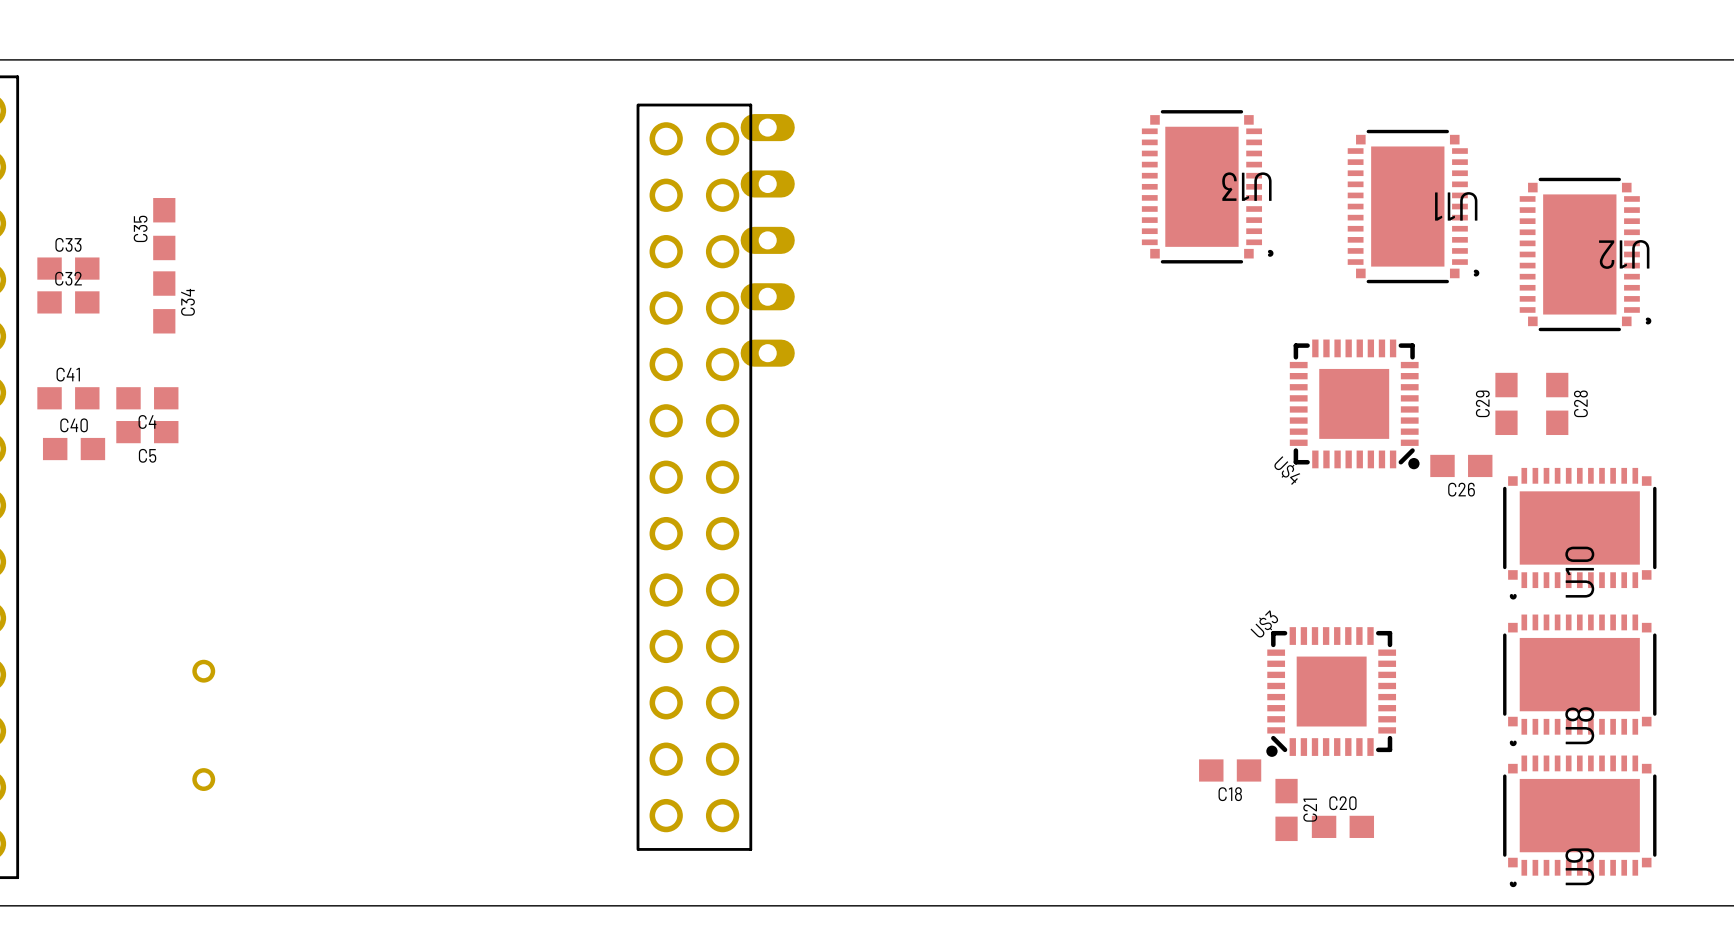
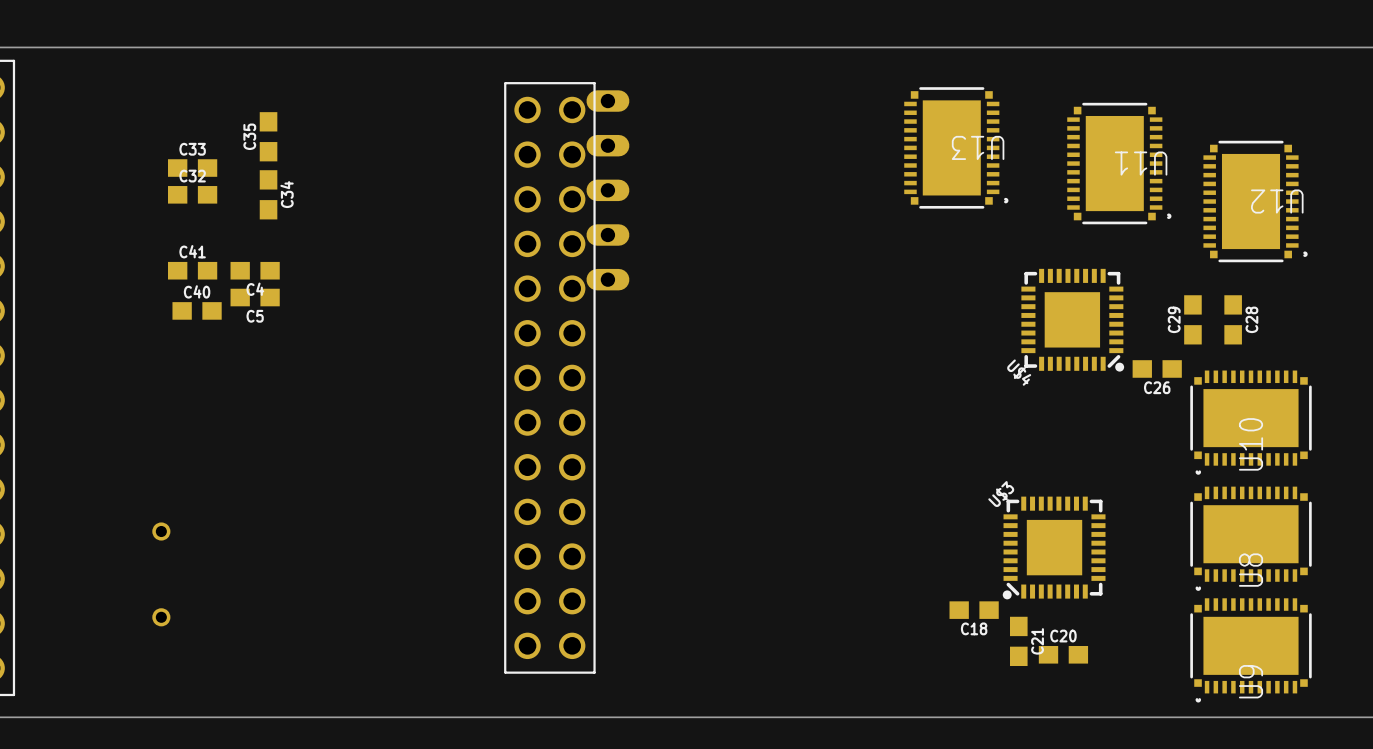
C35 position: (164, 229) -> (268, 136)
C33 position: (68, 268) -> (192, 168)
C32 position: (68, 302) -> (192, 194)
C34 position: (164, 302) -> (268, 194)
C41 position: (68, 398) -> (192, 270)
C4 position: (147, 398) -> (255, 270)
C5 position: (147, 432) -> (255, 297)
C40 position: (74, 449) -> (197, 310)

